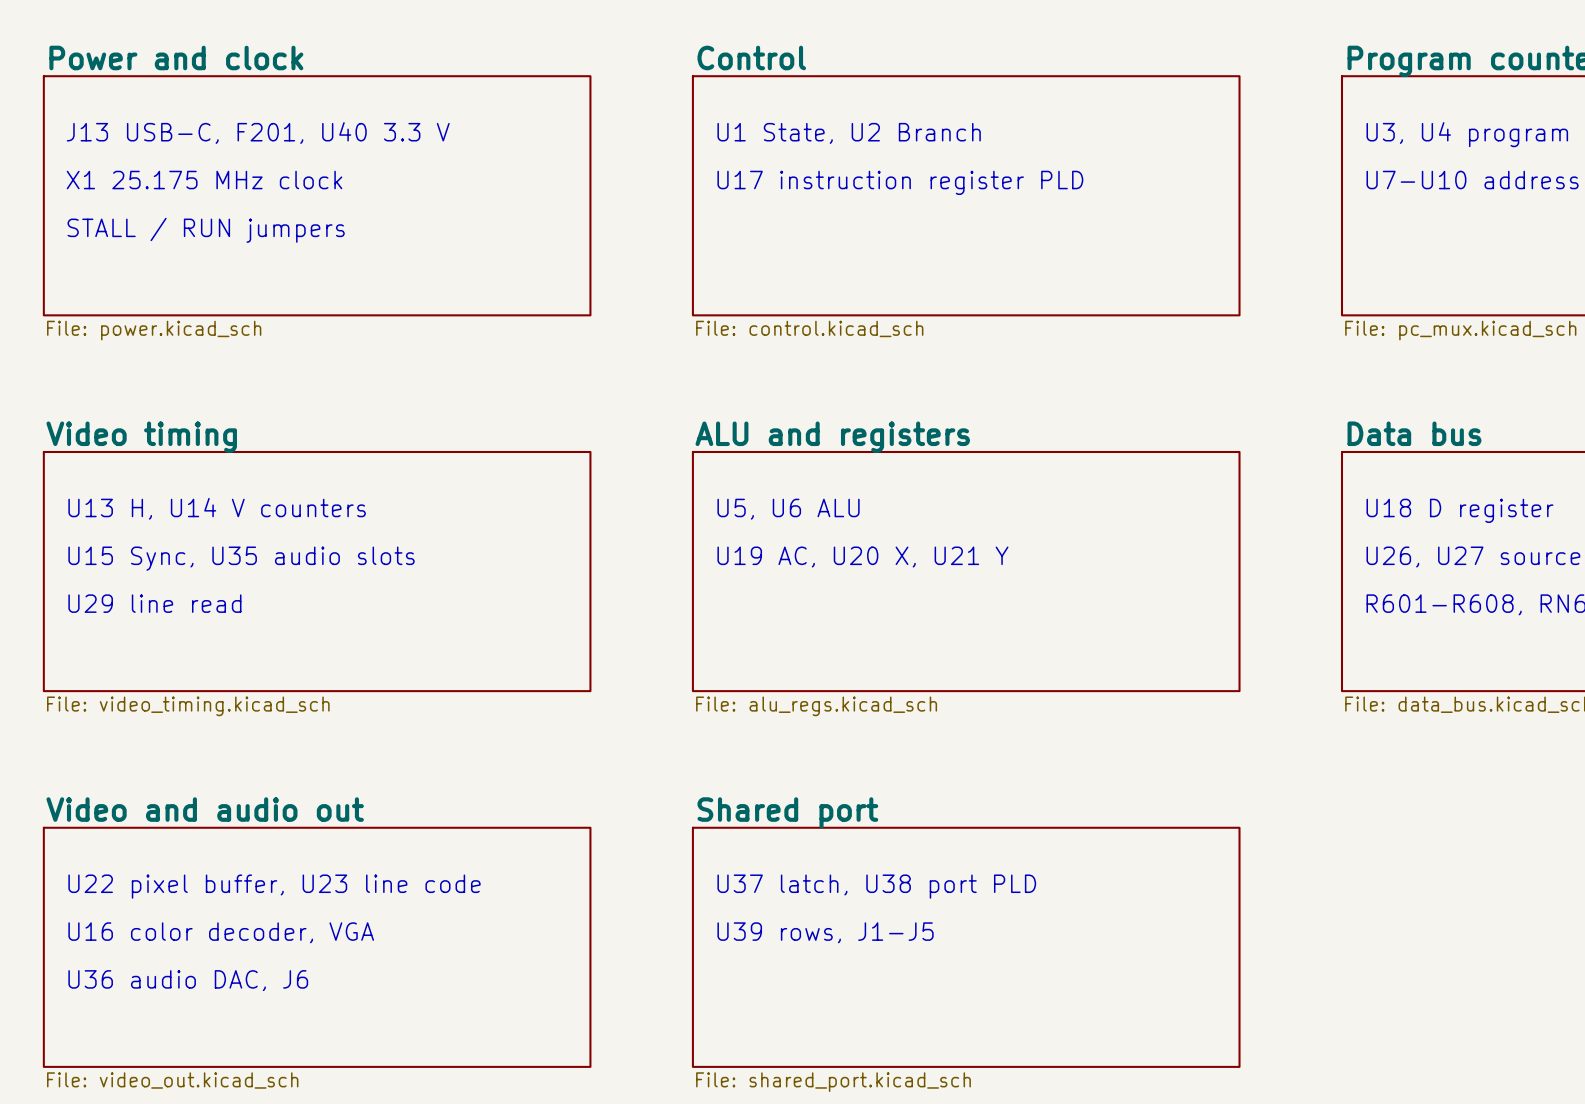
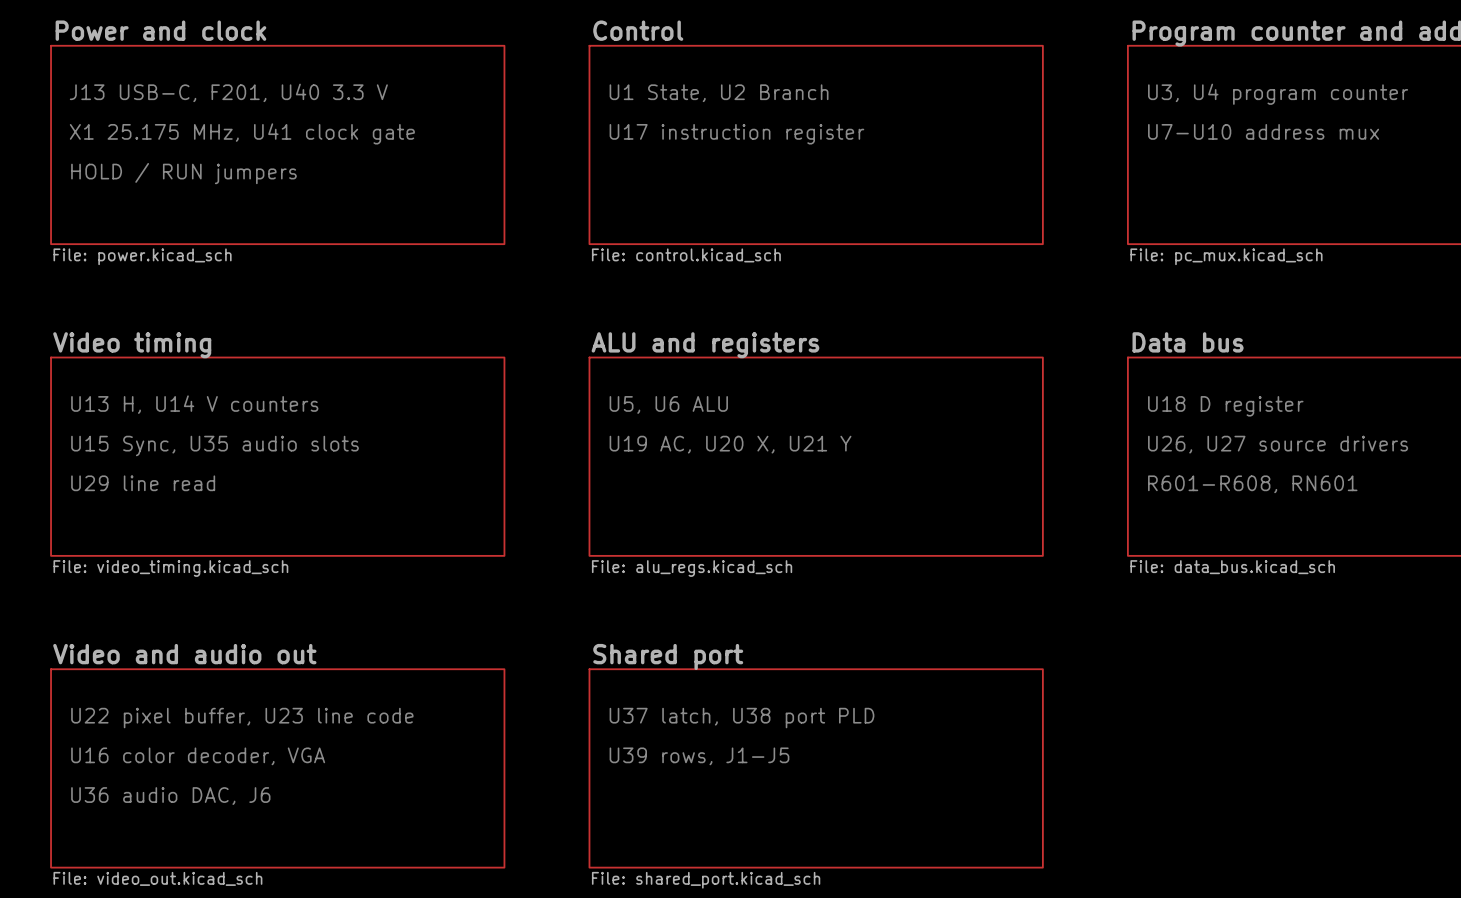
text: X1 25.175 MHz clock (204, 180) -> X1 25.175 MHz, U41 clock gate (242, 133)
text: U17 instruction register PLD (900, 182) -> U17 instruction register (736, 134)
text: STALL / RUN jumpers (206, 230) -> HOLD / RUN jumpers (183, 173)

